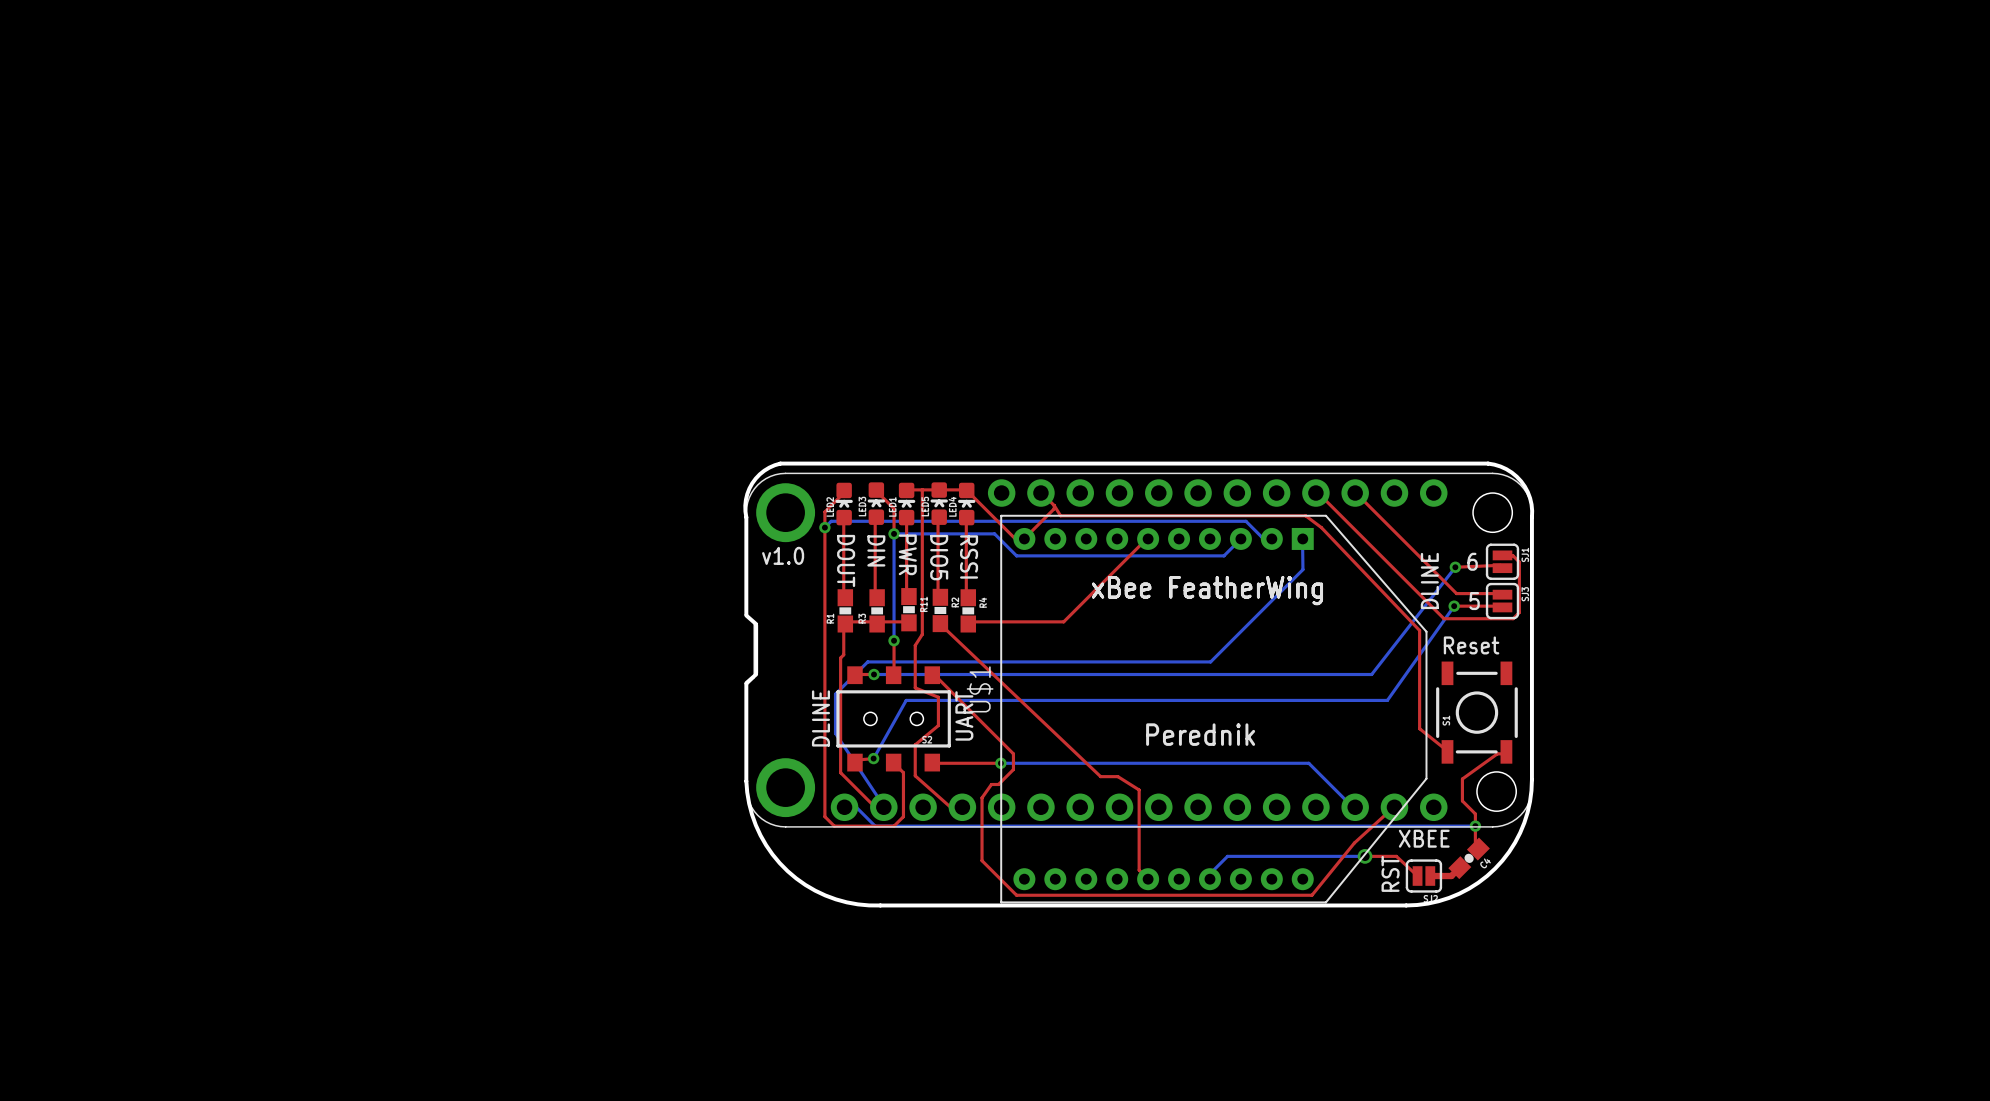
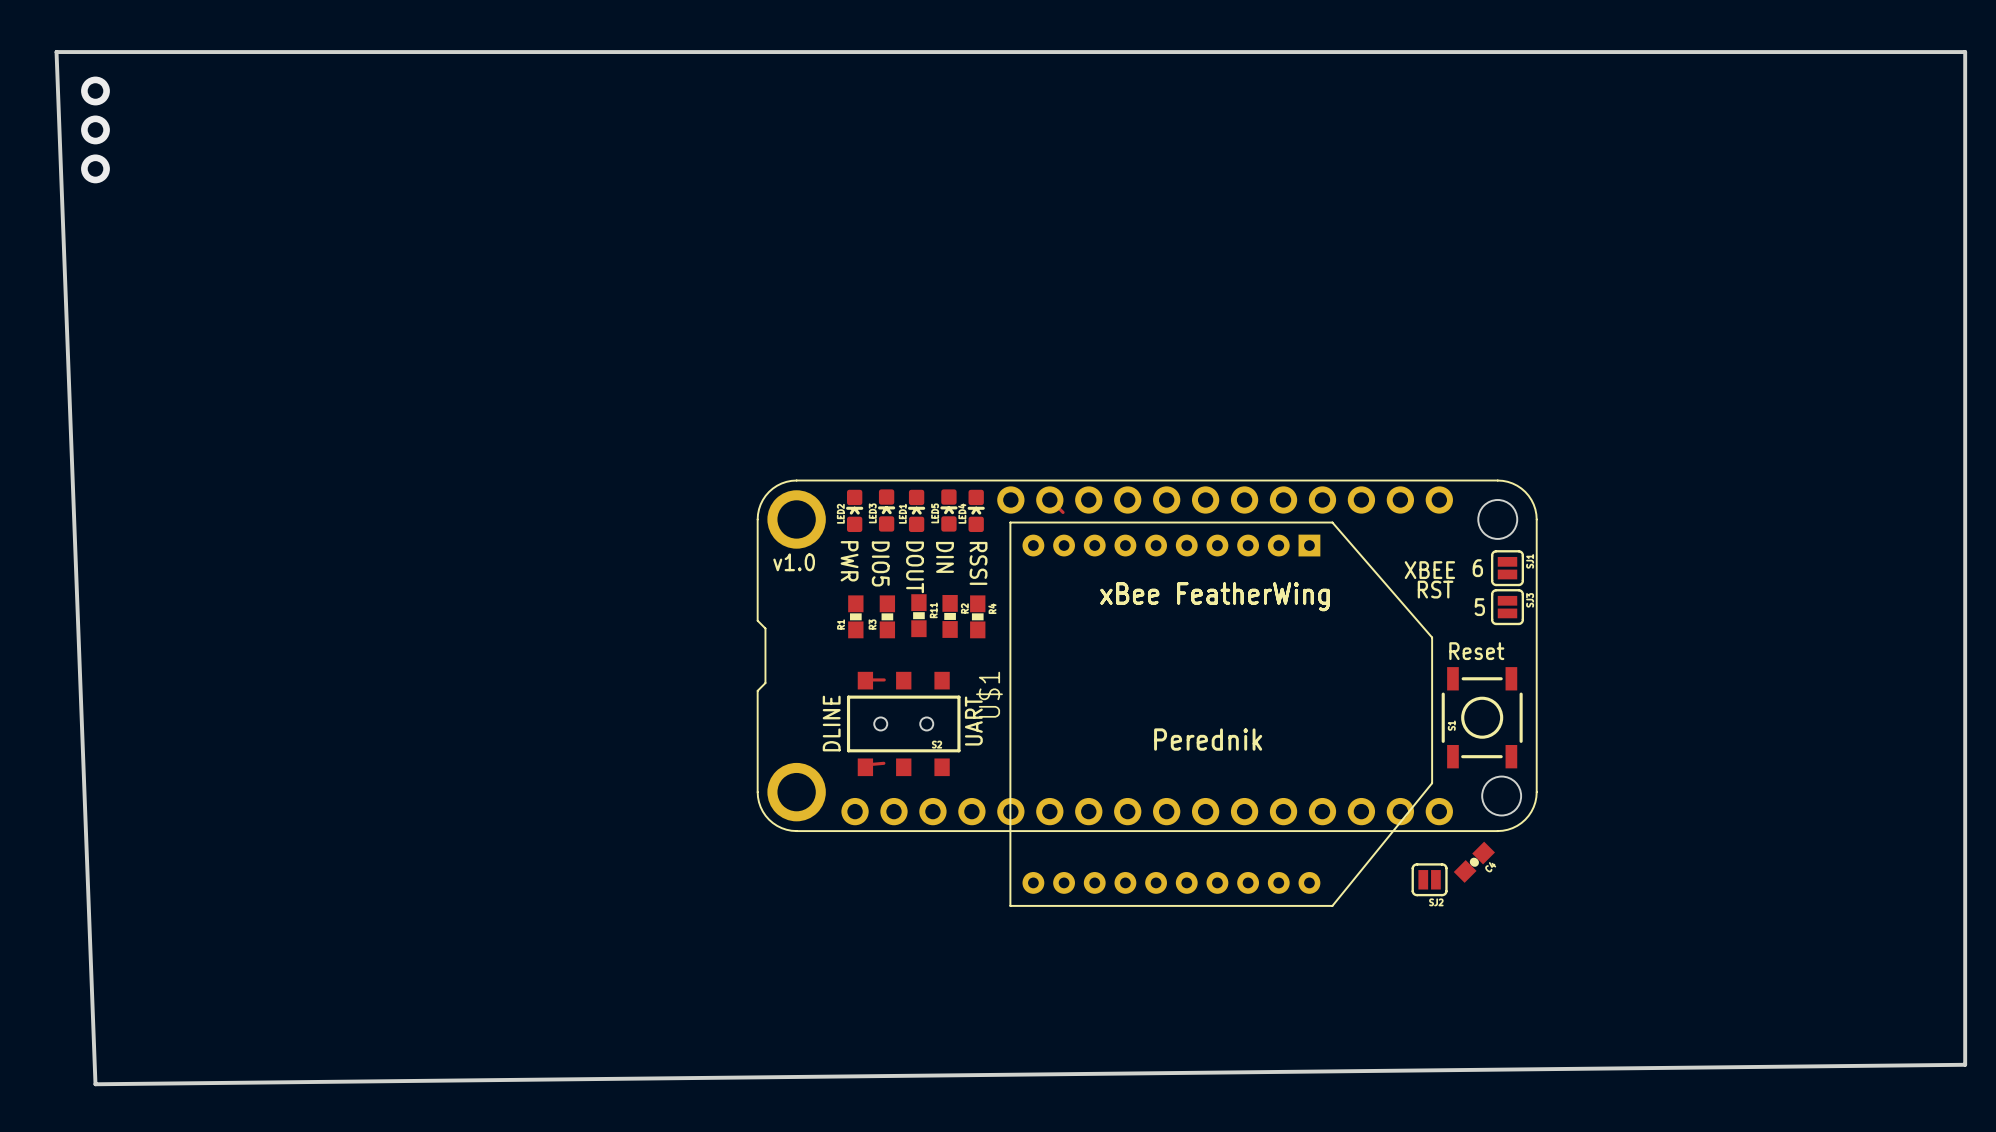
board edge: none -> (56, 52) (95, 1084) (1965, 1064) (1965, 52) (56, 52)
via: none -> (95, 90)
via: none -> (95, 129)
via: none -> (95, 168)
top track: (922, 489) (922, 634) (915, 645) (915, 687) (938, 697) (938, 725) (915, 744) (915, 775) (950, 807) (962, 807) -> none
top track: (844, 490) (824, 511) (824, 816) (834, 826) (894, 826) (903, 816) (903, 772) (893, 762) -> none
top track: (876, 490) (894, 508) (894, 533) -> none
top track: (906, 490) (966, 489) (1015, 538) (1024, 538) (1054, 508) (1054, 505) (1060, 515) (1305, 515) (1321, 527) (1419, 630) (1419, 728) (1447, 751) -> none
top track: (1315, 493) (1318, 493) (1443, 618) (1513, 618) (1519, 612) (1519, 562) (1513, 555) (1502, 555) -> none
top track: (1355, 493) (1456, 593) (1502, 594) -> none
top track: (844, 517) (843, 596) (845, 597) -> none
top track: (876, 517) (875, 596) (877, 597) -> none
top track: (906, 517) (906, 593) (908, 596) -> none
top track: (939, 517) (938, 596) (940, 597) -> none
top track: (966, 517) (966, 596) (968, 597) -> none
bottom track: (824, 527) (831, 521) (1245, 521) (1261, 537) (1271, 537) (1271, 538) -> none
via: (824, 527) -> none
via: (894, 533) -> none
top track: (1148, 538) (1063, 621) (969, 621) (968, 624) -> none
bottom track: (1240, 538) (1223, 555) (1016, 555) (994, 533) (894, 533) (894, 640) -> none
bottom track: (1302, 538) (1302, 569) (1210, 661) (867, 661) (835, 694) (835, 733) (883, 807) -> none
text position: DIN (876, 550) -> DIN (945, 557)
text position: PWR (907, 554) -> PWR (849, 561)
text position: DIO5 (939, 557) -> DIO5 (880, 564)
text position: DOUT (846, 560) -> DOUT (915, 567)
top track: (1455, 567) (1500, 565) (1502, 568) -> none
bottom track: (1455, 567) (1371, 674) (874, 674) -> none
via: (1455, 567) -> none
text: DLINE (1429, 580) -> none
top track: (1454, 606) (1502, 607) -> none
bottom track: (1454, 606) (1387, 700) (906, 700) (873, 758) -> none
via: (1454, 606) -> none
board edge: (746, 614) (745, 499) (749, 488) (755, 478) (769, 467) (780, 463) (1488, 463) (1506, 469) (1516, 476) (1527, 492) (1531, 504) (1531, 779) (1527, 812) (1515, 842) (1495, 868) (1469, 888) (1438, 901) (1406, 905) (880, 905) (857, 904) (835, 899) (805, 884) (787, 871) (772, 854) (755, 825) (749, 803) (746, 781) (746, 684) -> none
board edge: (746, 615) (756, 624) -> none
top track: (908, 622) (878, 621) (877, 624) (875, 621) (846, 621) (843, 625) (843, 654) (840, 658) (840, 772) (875, 807) (883, 807) -> none
top track: (940, 623) (1100, 776) (1117, 776) (1139, 789) (1139, 870) (1148, 879) -> none
board edge: (756, 625) (756, 673) -> none
top track: (894, 640) (893, 675) -> none
via: (894, 640) -> none
board edge: (756, 674) (746, 683) -> none
via: (874, 674) -> none
top track: (932, 675) (934, 675) (1013, 753) (1013, 769) (998, 784) (991, 784) (982, 797) (982, 860) (1016, 895) (1311, 895) (1354, 843) (1394, 807) -> none
top track: (1506, 751) (1497, 753) (1462, 778) (1462, 800) (1475, 813) (1475, 848) (1478, 849) -> none
via: (873, 758) -> none
top track: (932, 762) (1000, 763) -> none
bottom track: (1000, 763) (1308, 763) (1352, 807) (1355, 807) -> none
via: (1000, 763) -> none
bottom track: (844, 807) (856, 807) (875, 826) (1475, 826) -> none
via: (1475, 826) -> none
text position: XBEE (1424, 838) -> XBEE (1429, 570)
top track: (1365, 856) (1396, 856) (1417, 876) -> none
bottom track: (1365, 856) (1227, 856) (1209, 873) (1209, 879) -> none
via: (1365, 856) -> none
top track: (1459, 867) (1451, 876) (1430, 876) -> none
text rotation: 0° (1390, 873) -> 90° clockwise (1435, 589)
text position: RST (1390, 873) -> RST (1435, 589)

